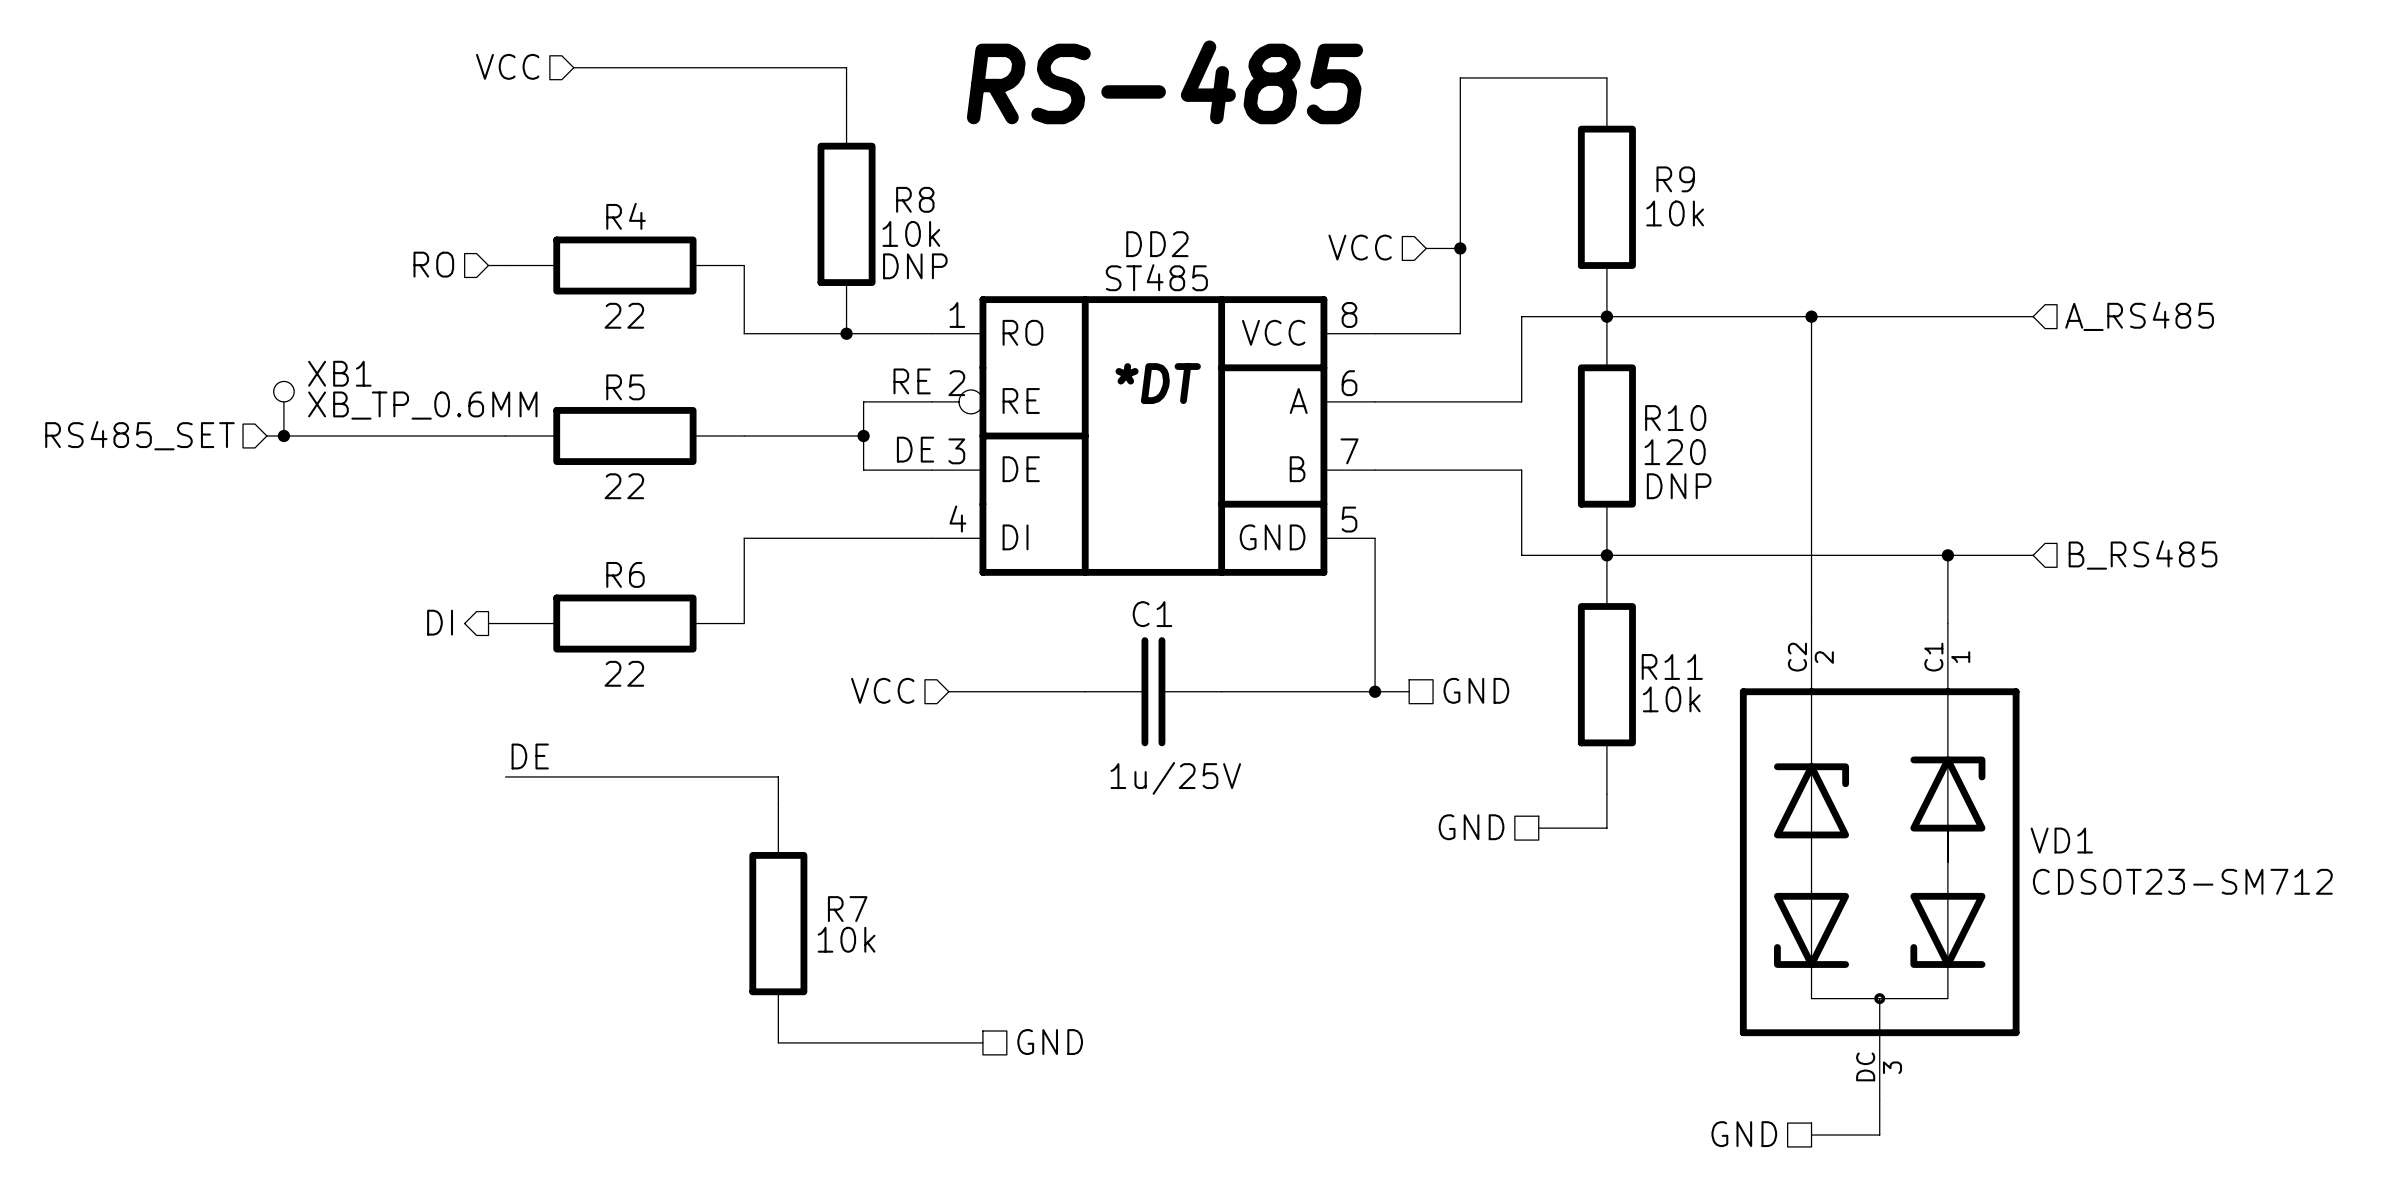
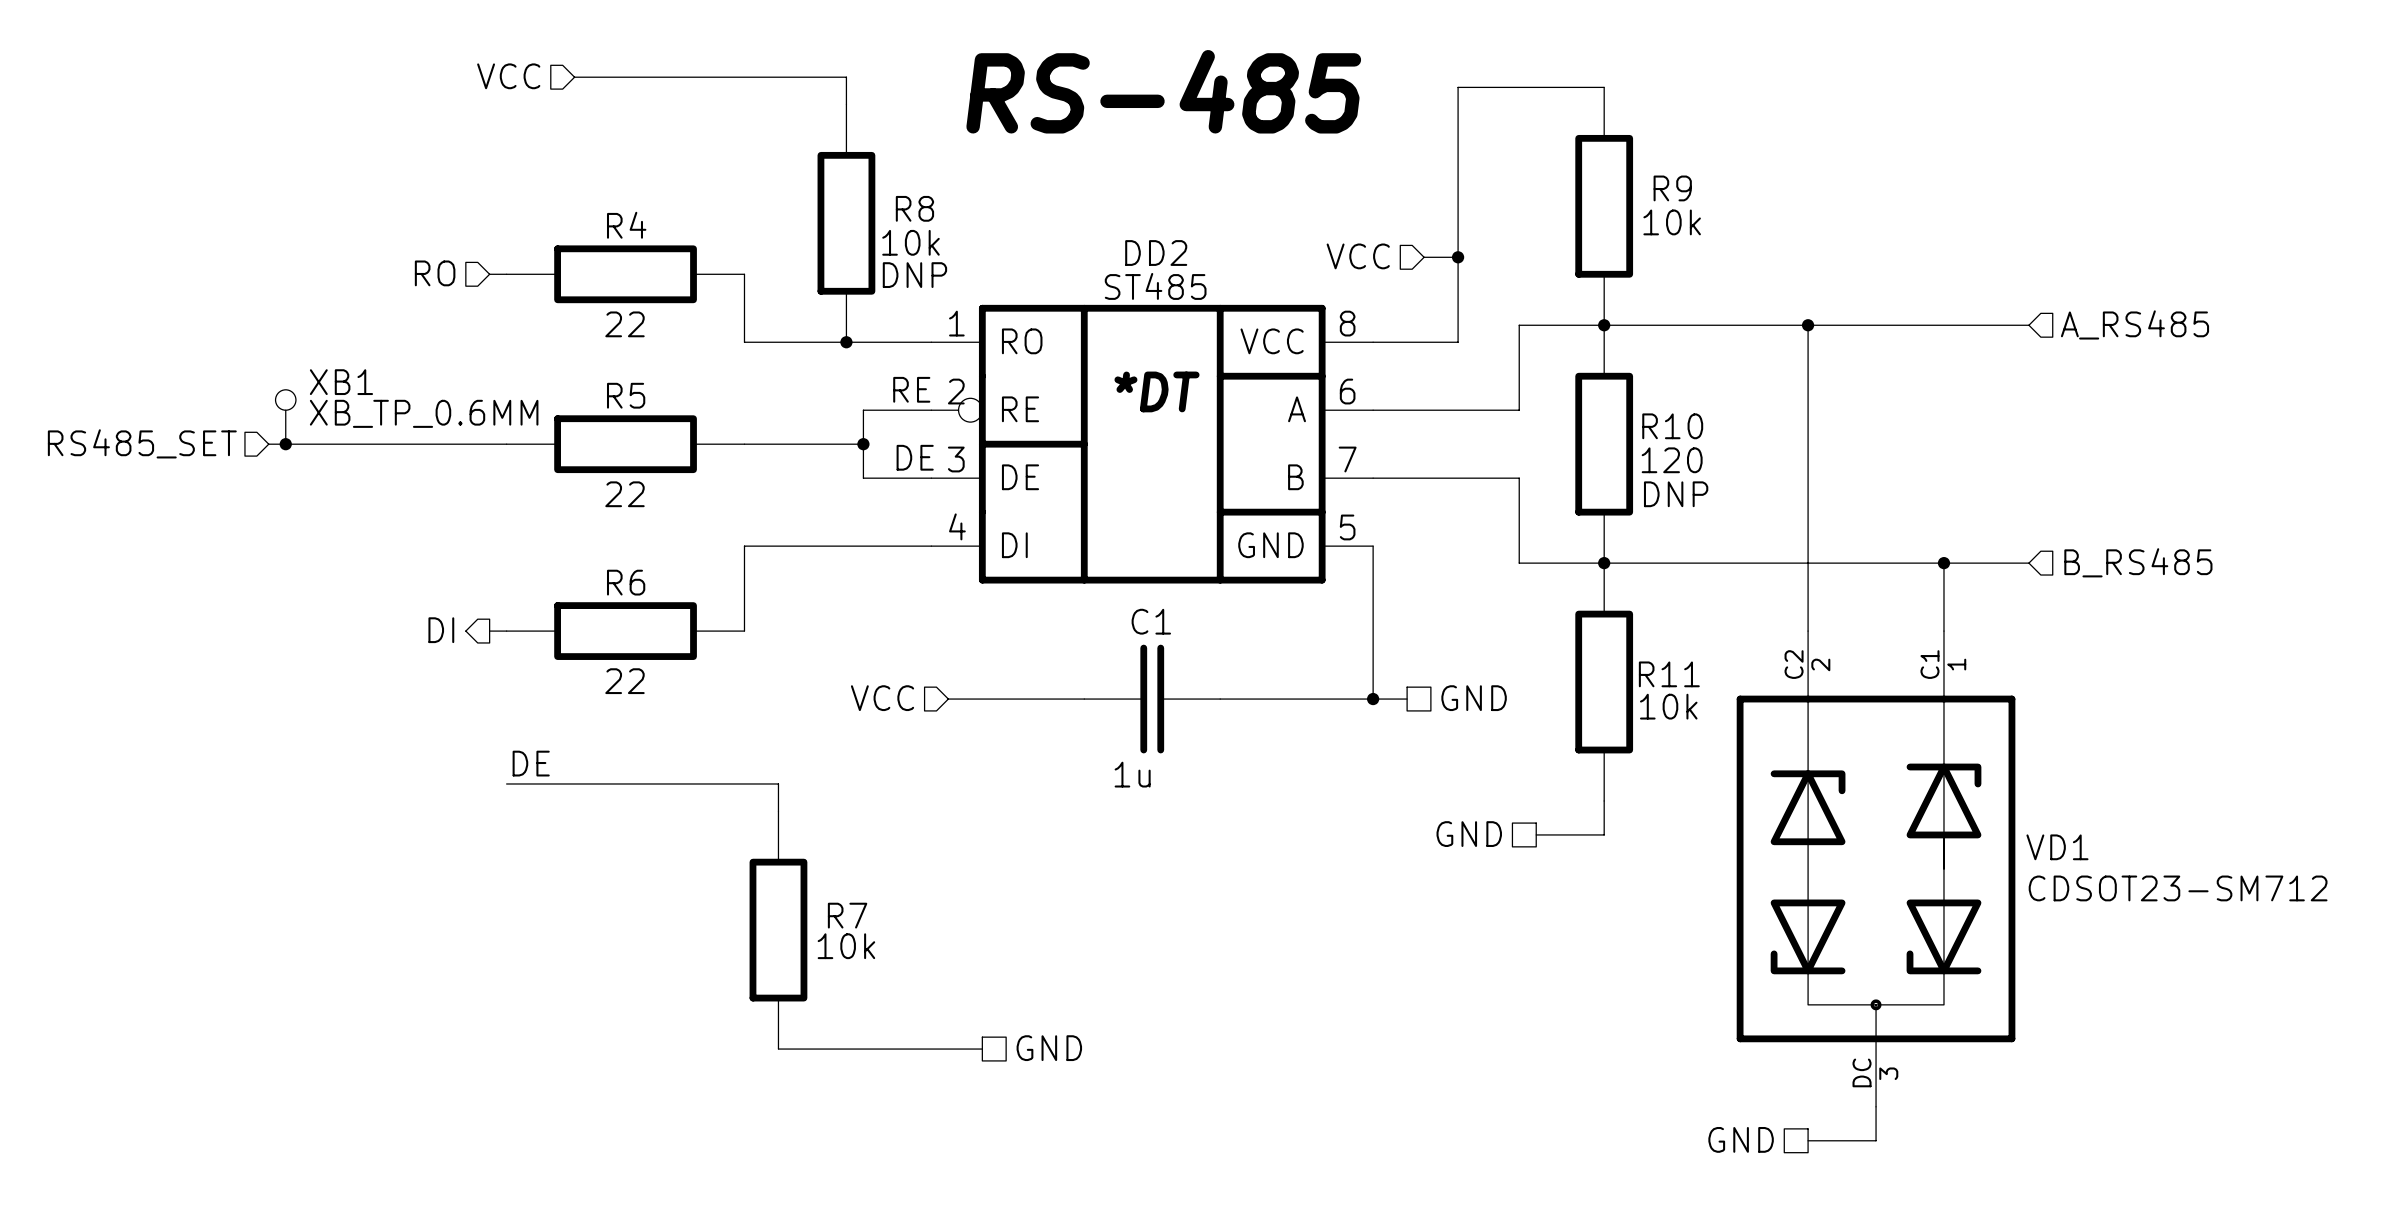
C1 value: 1u/25V (1175, 778) -> 1u (1132, 774)

